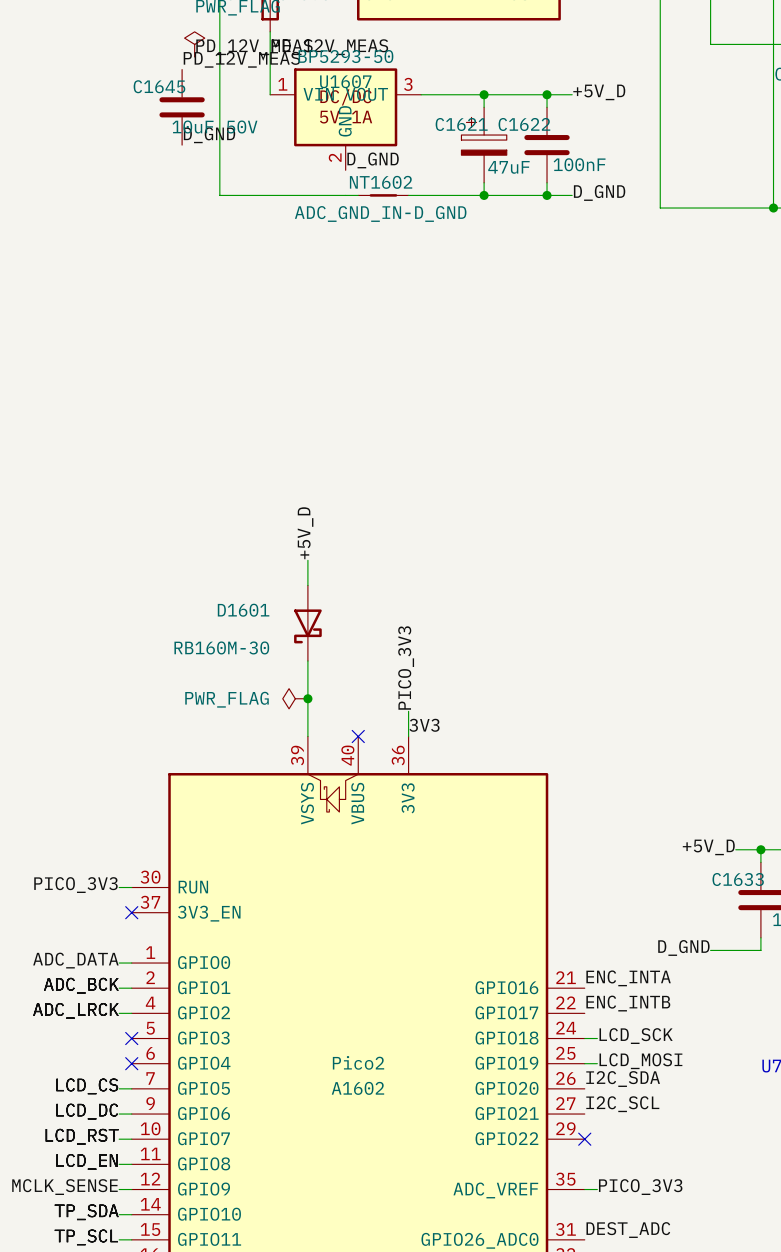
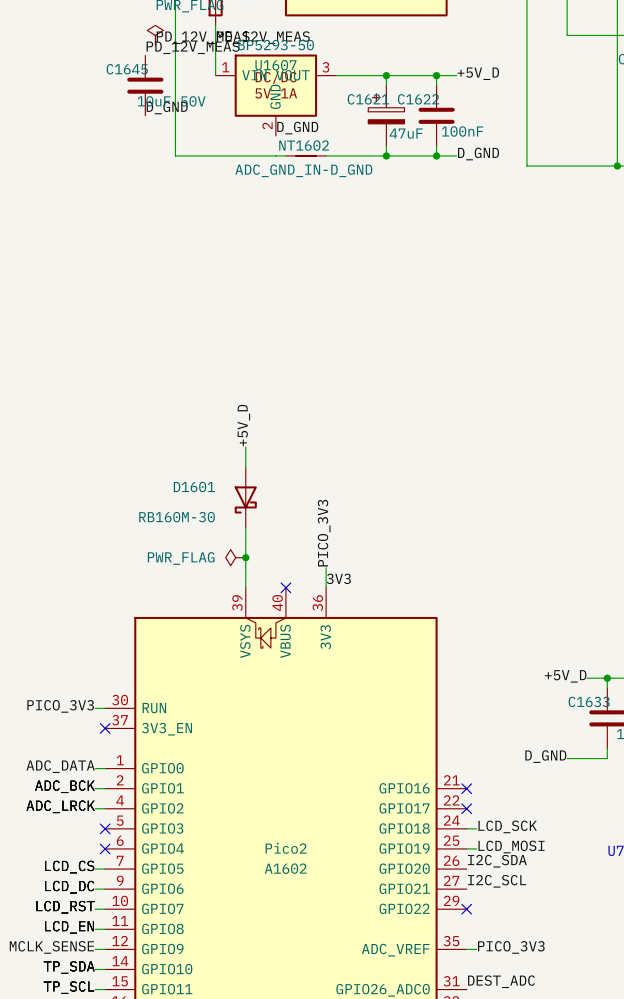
label: ENC_INTA (628, 978) -> none
no-connect mark: none -> (466, 788)
label: ENC_INTB (628, 1003) -> none
no-connect mark: none -> (466, 808)

